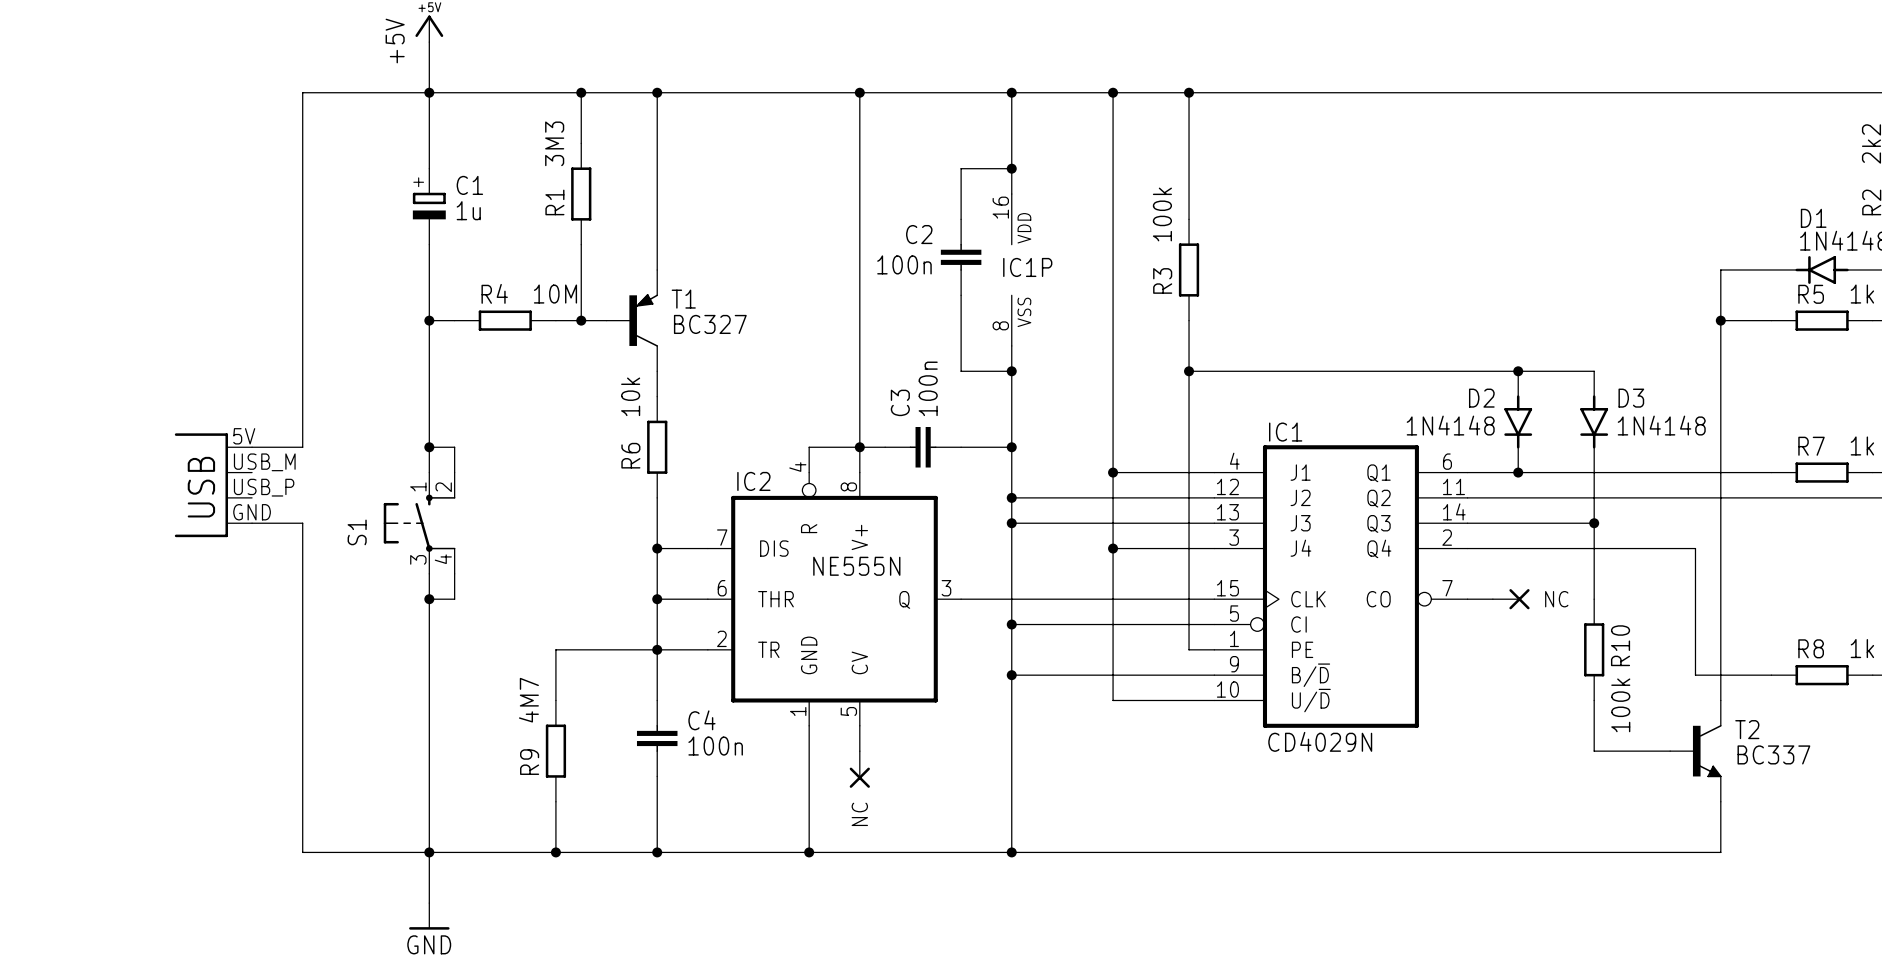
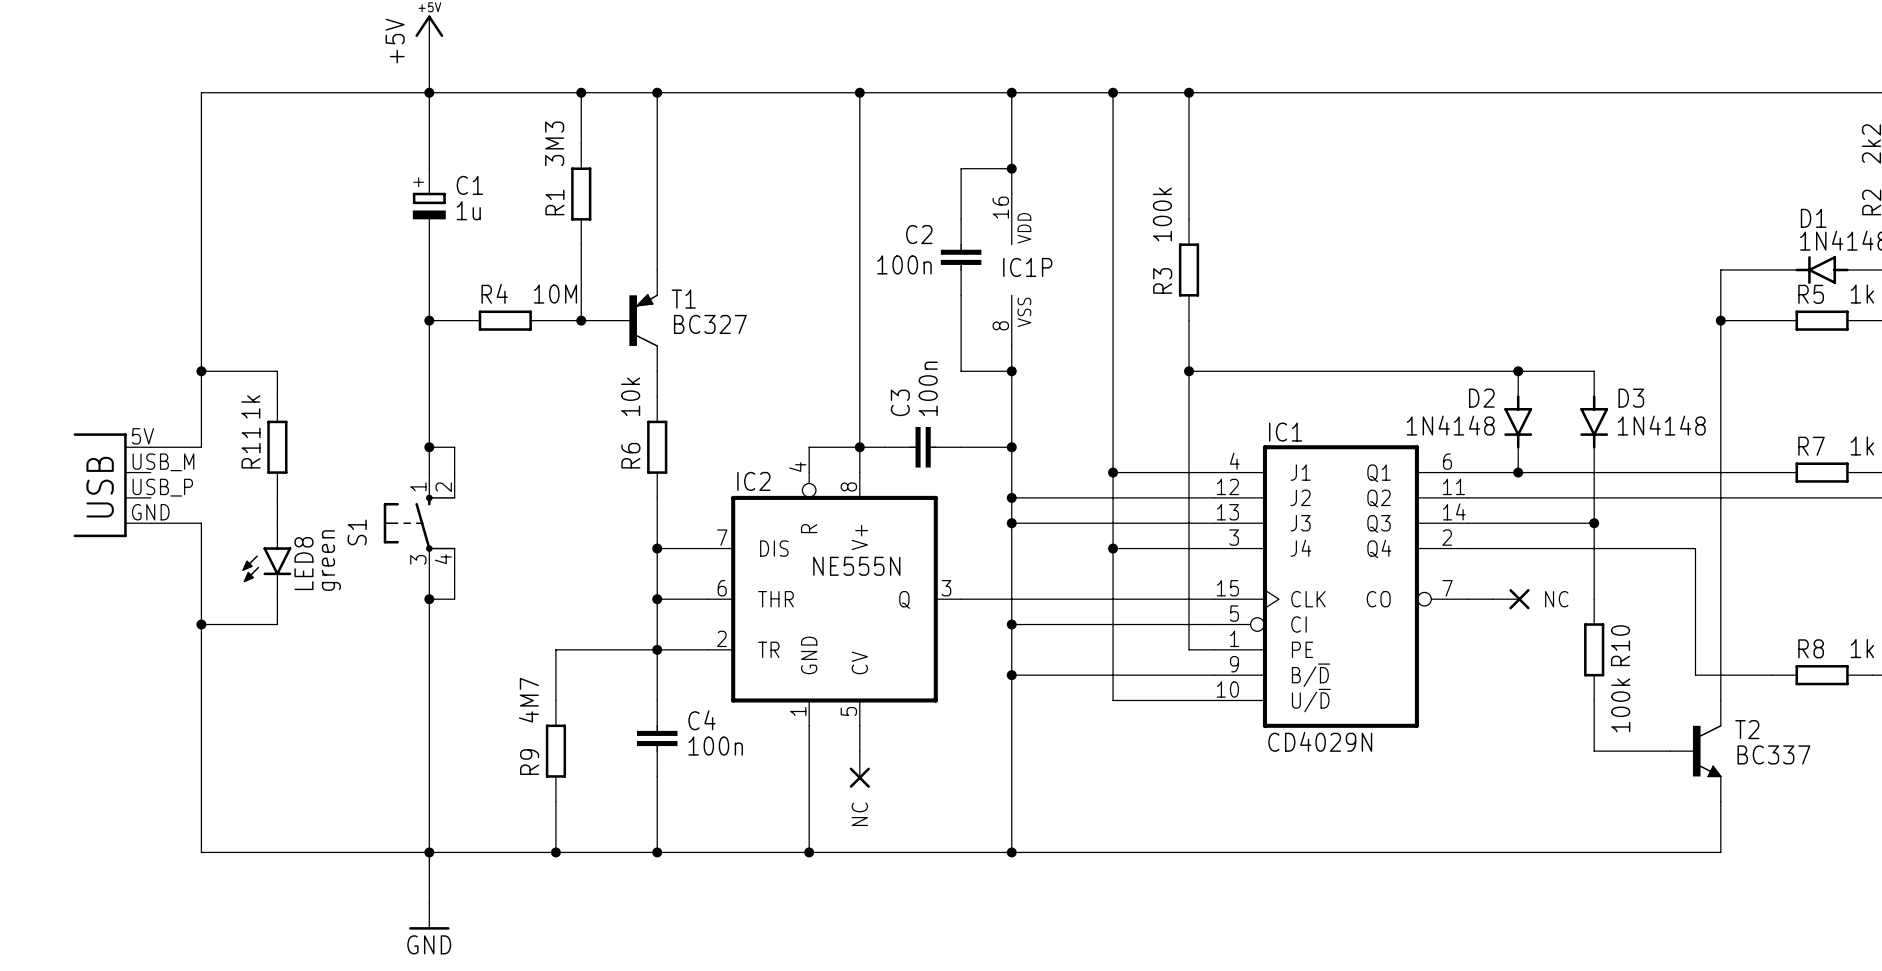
wire: (302, 92) (302, 447) (252, 447) -> (302, 92) (201, 92) (201, 447) (150, 447)
wire: none -> (201, 371) (277, 371) (277, 396)
junction: none -> (201, 371)
R11: none -> 1k (277, 447)
part position: (213, 485) -> (112, 485)
wire: none -> (277, 497) (277, 523)
wire: (252, 523) (302, 523) (302, 852) -> (150, 523) (201, 523) (201, 852) (302, 852)
LED8: none -> green (266, 561)
wire: none -> (277, 599) (277, 624) (201, 624)
junction: none -> (201, 624)

